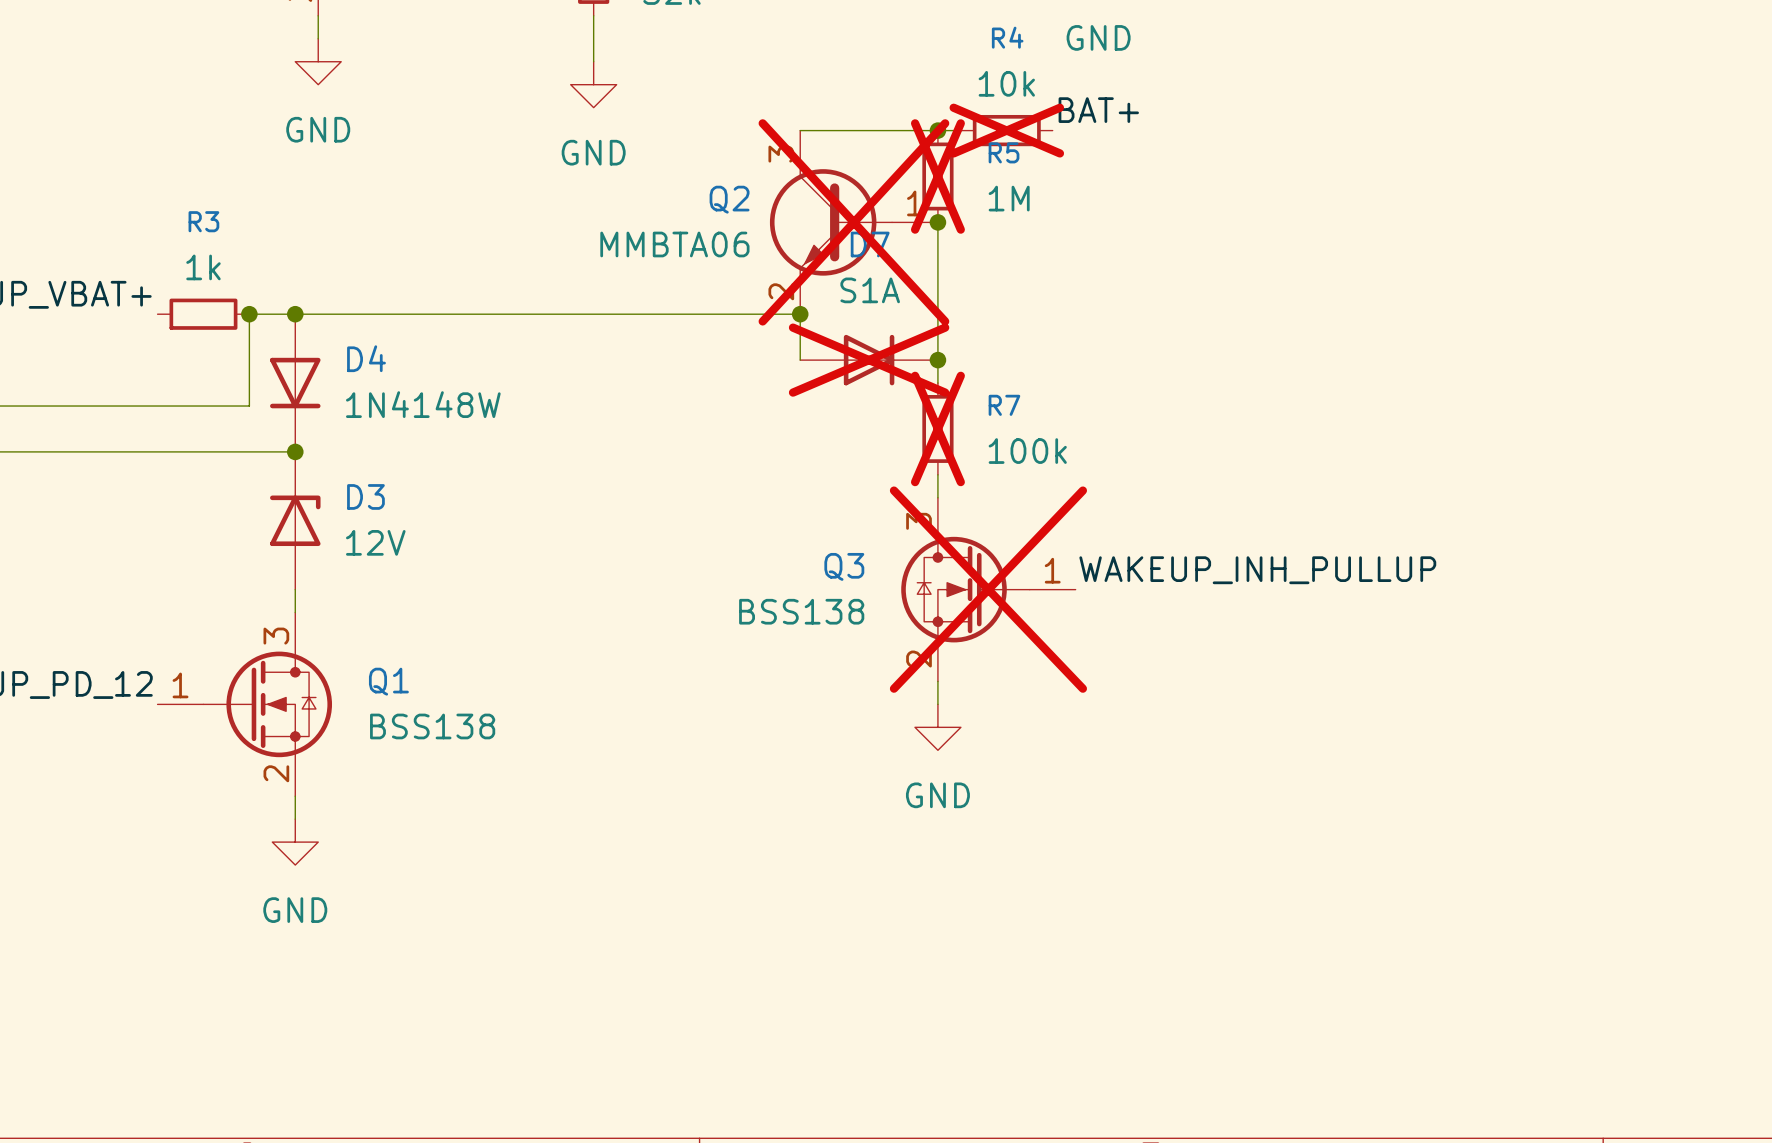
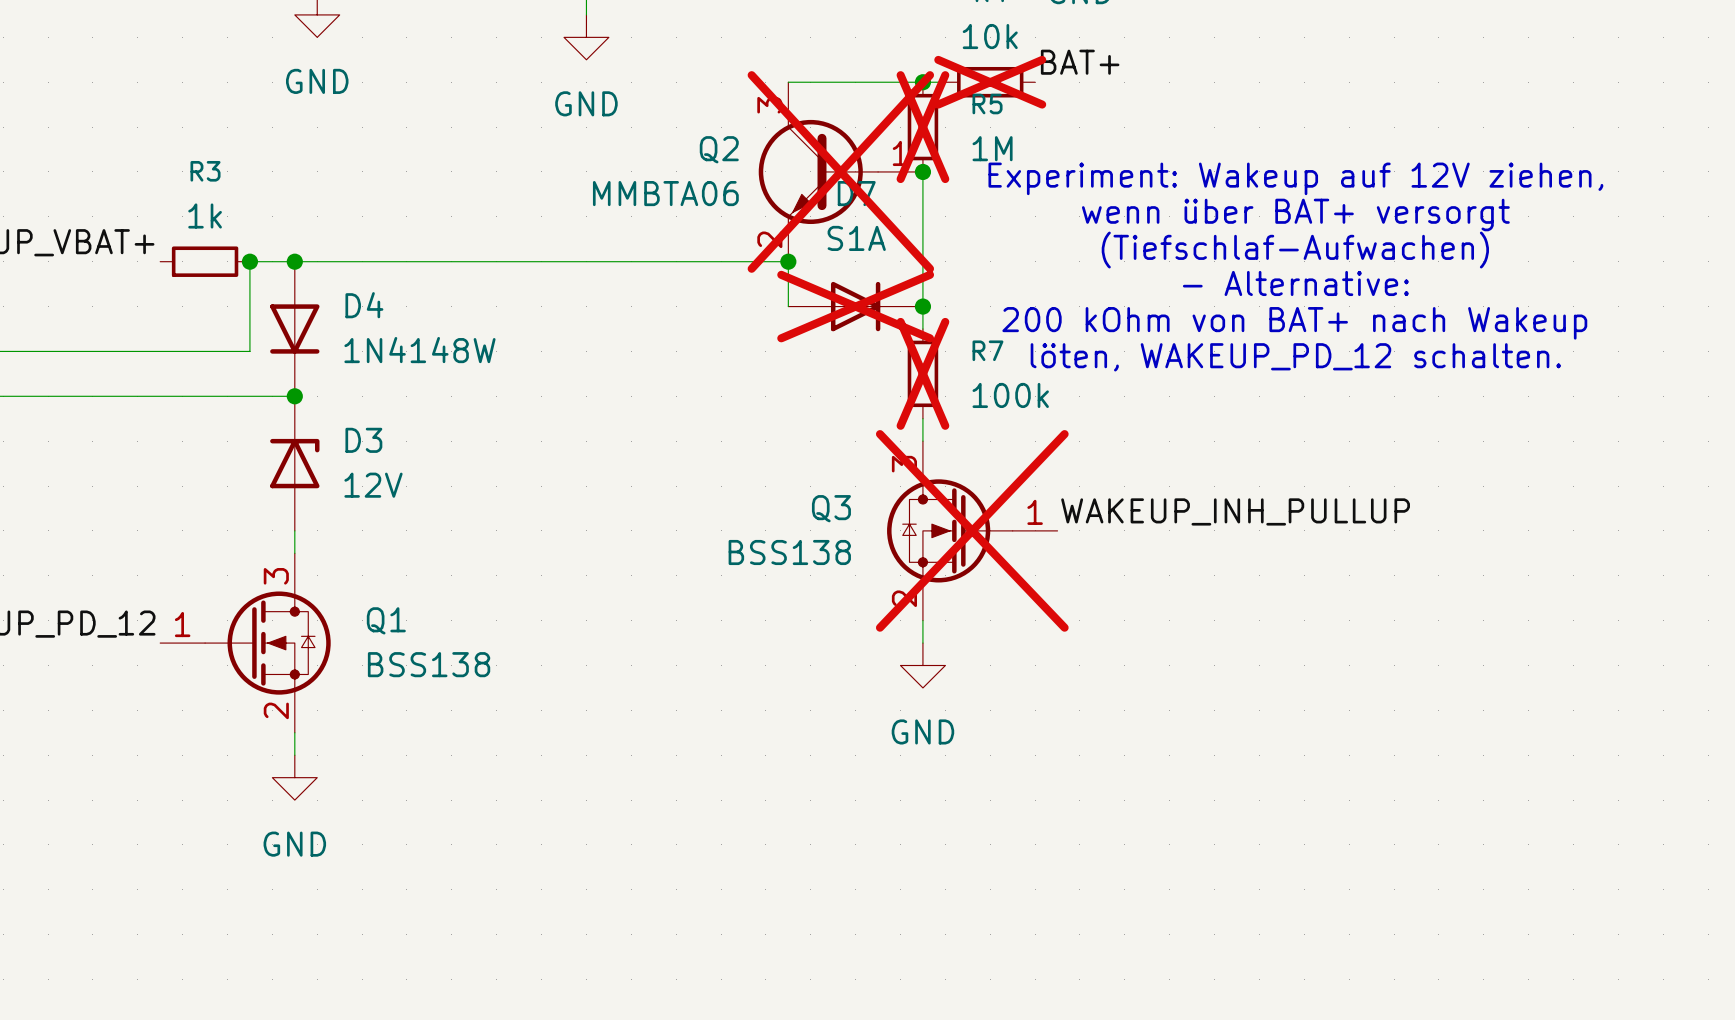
text: none -> Experiment: Wakeup auf 12V ziehen, (1295, 178)
text: none -> wenn über BAT+ versorgt (1295, 214)
text: none -> (Tiefschlaf-Aufwachen) (1295, 250)
text: none -> - Alternative: (1295, 283)
text: none -> 200 kOhm von BAT+ nach Wakeup (1294, 323)
text: none -> löten, WAKEUP_PD_12 schalten. (1295, 357)

